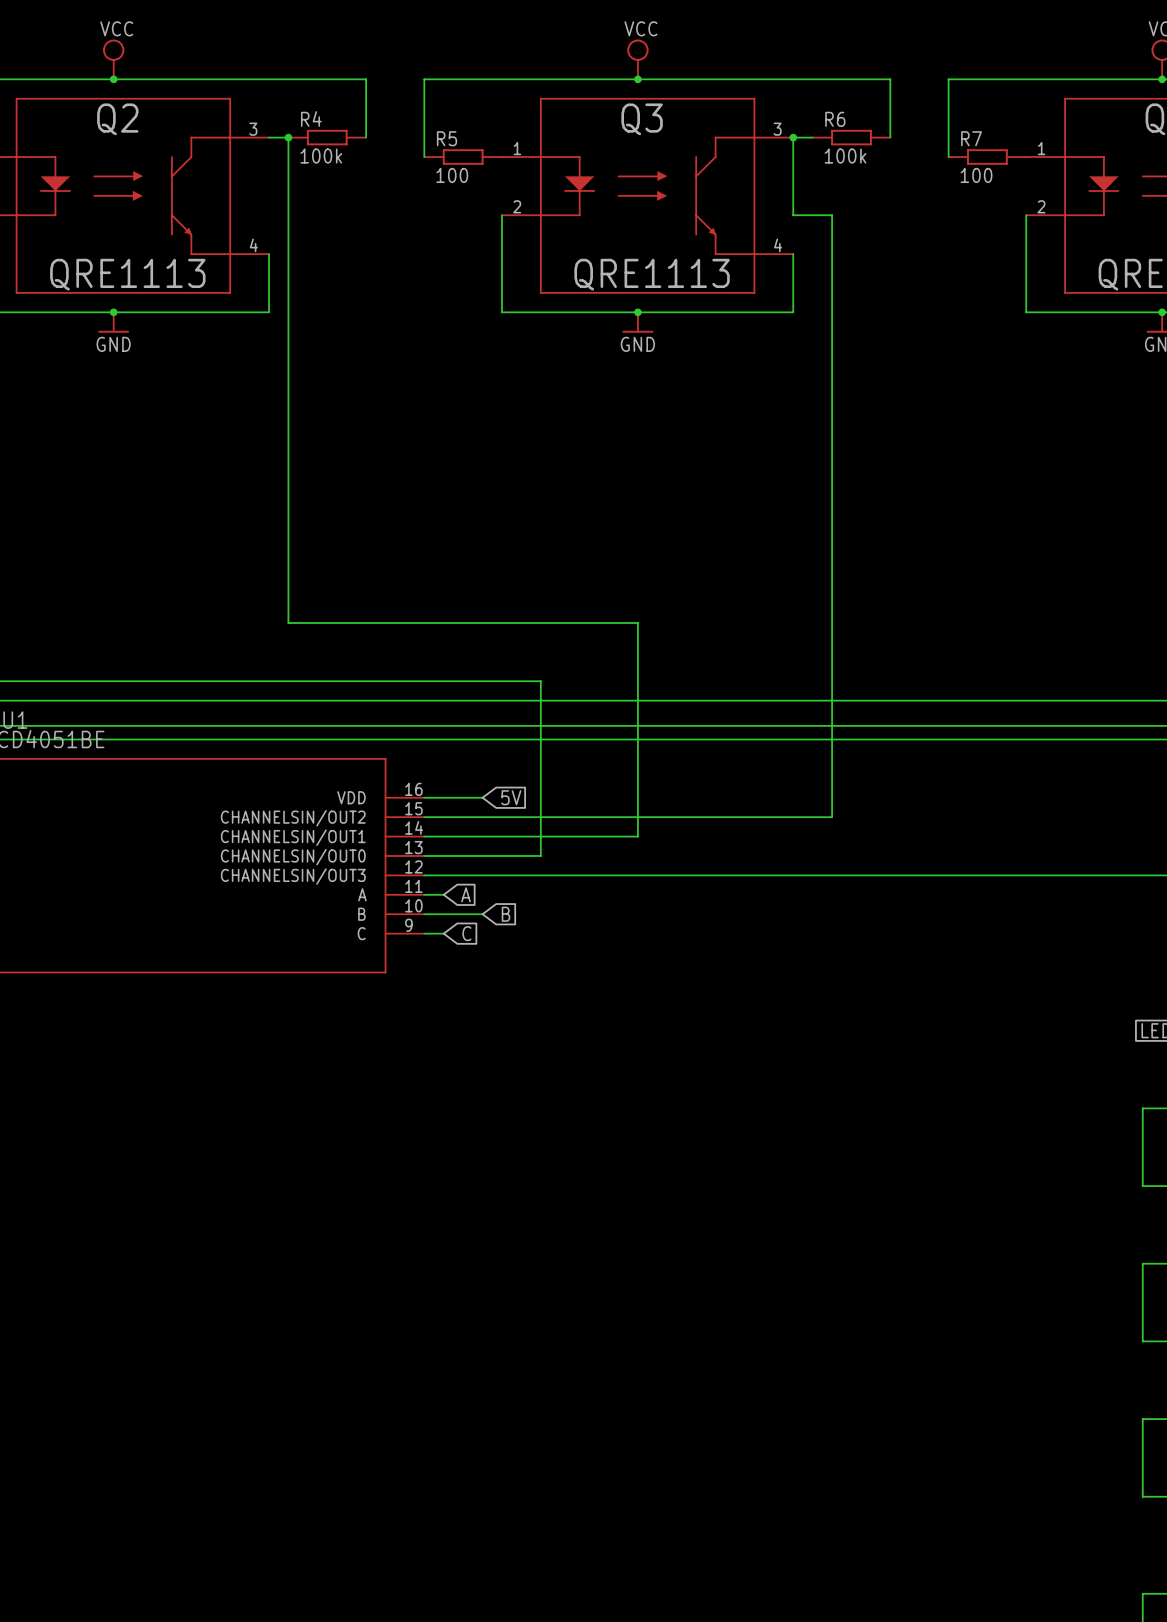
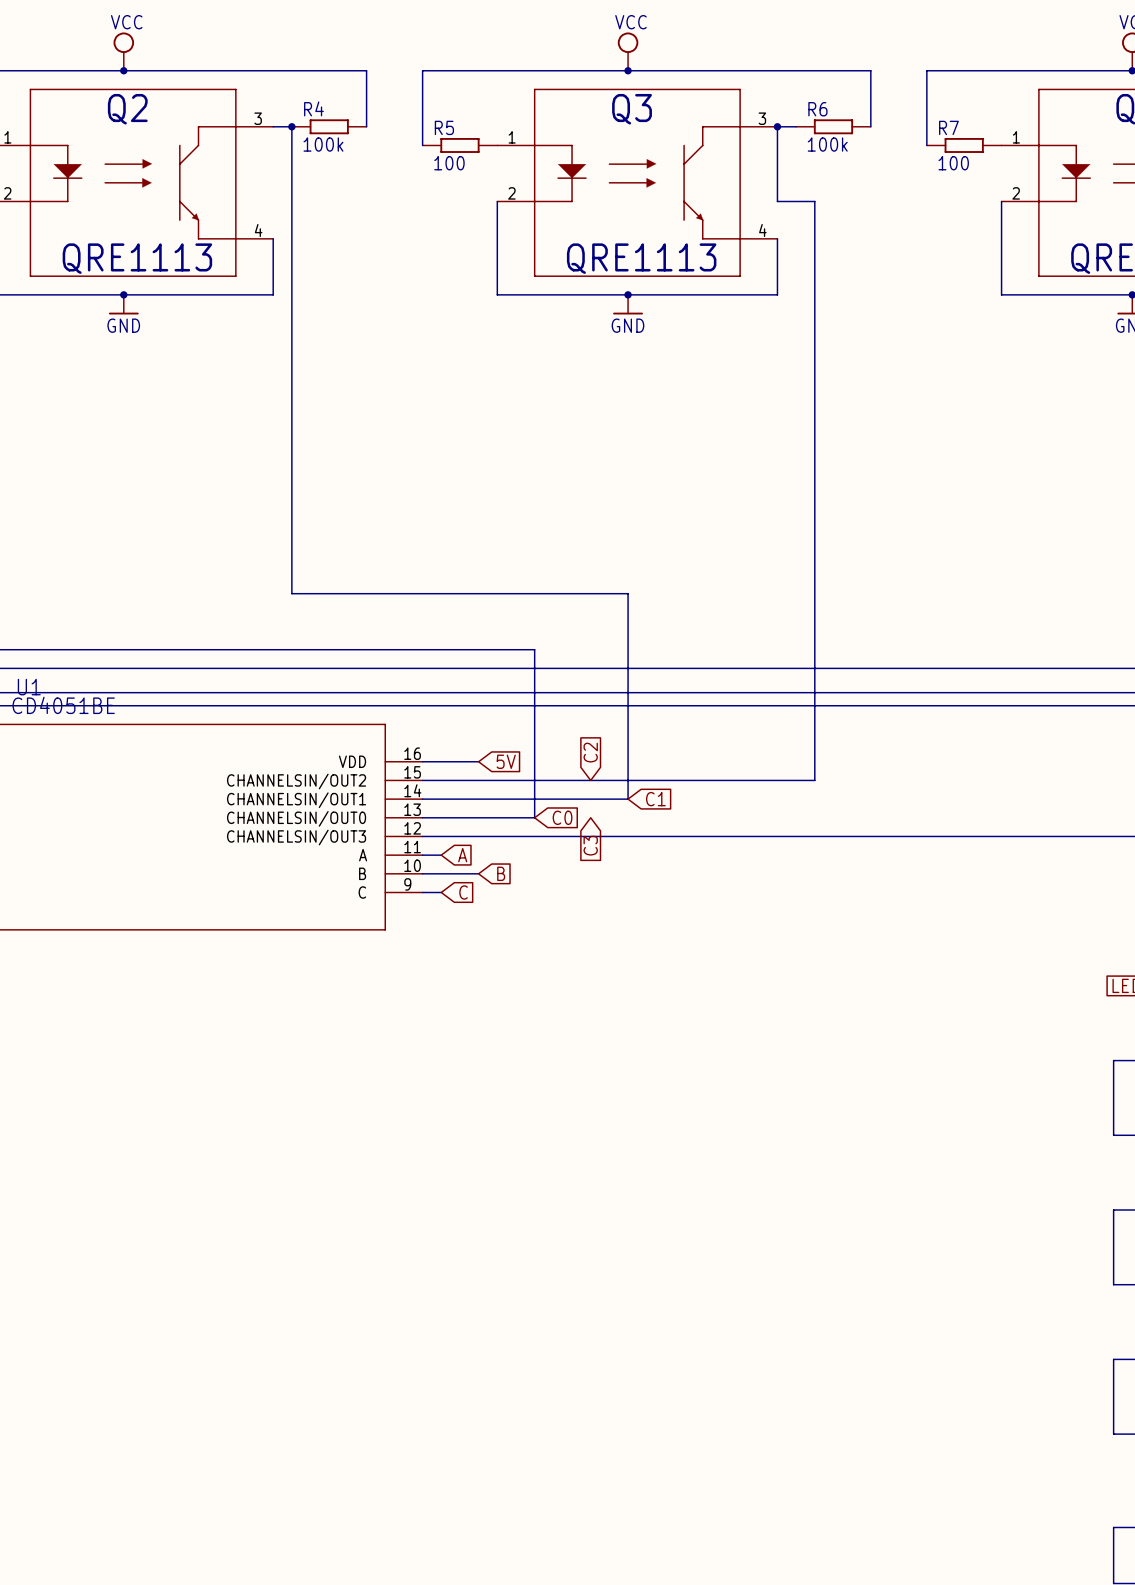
global label: none -> C2 (590, 752)
global label: none -> C1 (655, 799)
global label: none -> C0 (562, 817)
global label: none -> C3 (590, 845)

